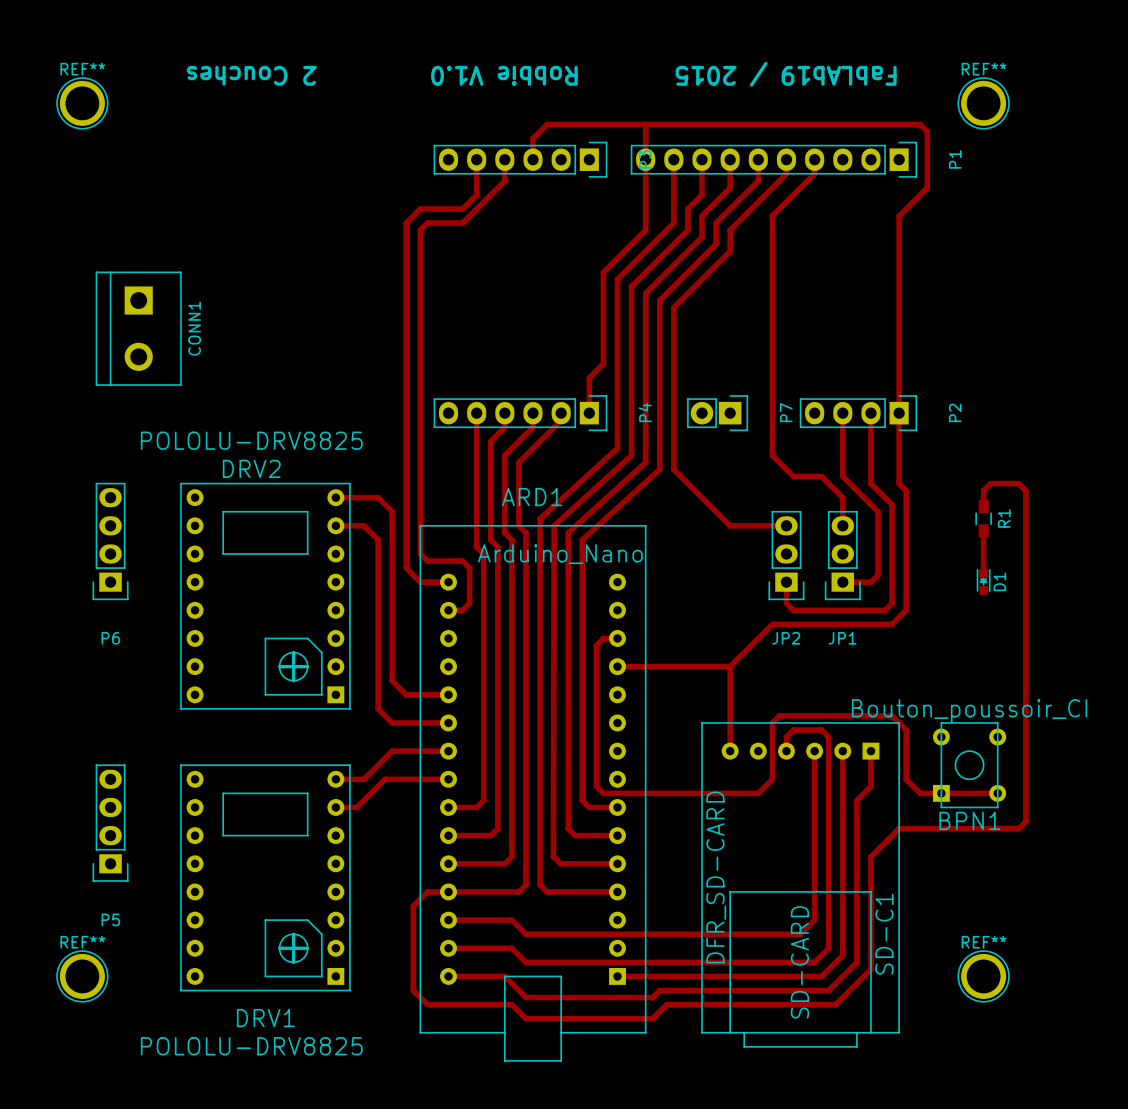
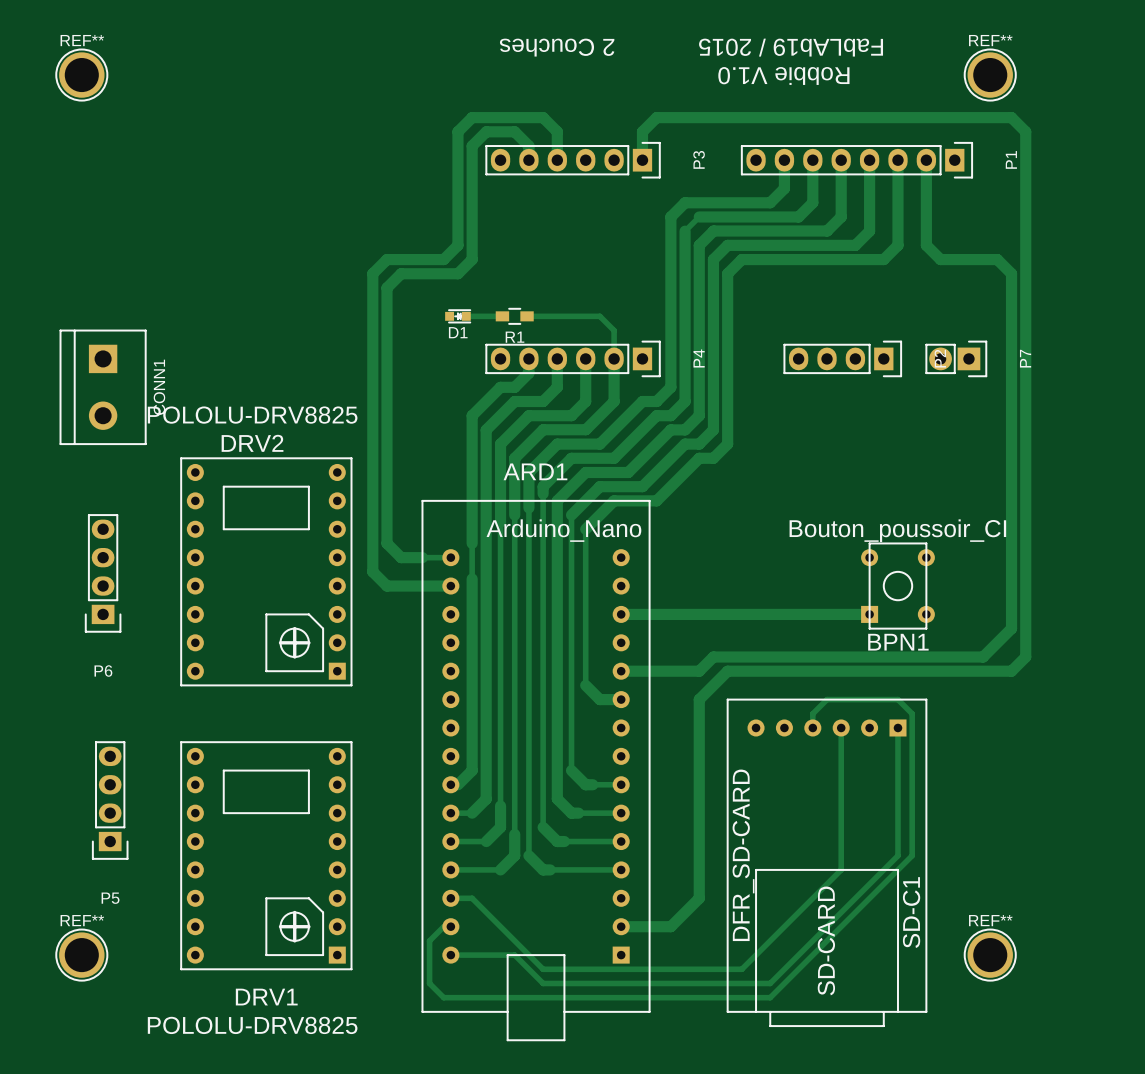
text: 2 Couches (251, 75) -> none
text position: Robbie V1.0 (504, 75) -> Robbie V1.0 (783, 75)
text: none -> 2 Couches (557, 47)
track: (645, 124) (645, 230) (603, 272) (603, 363) (589, 377) (589, 413) -> none
P1 footprint: [630, 141, 918, 178] -> [741, 142, 973, 179]
track: (476, 159) (476, 194) (462, 208) (420, 208) (406, 223) (406, 568) (420, 582) -> (528, 160) (528, 146) (514, 131) (486, 131) (472, 146) (472, 259) (457, 273) (401, 273) (386, 287) (386, 543) (401, 557) (422, 557)
track: (504, 159) (504, 180) (462, 223) (427, 223) (420, 230) (420, 553) (427, 561) (462, 561) (469, 568) -> (528, 358) (528, 373) (514, 387) (500, 387) (472, 415) (472, 543)
P3 position: (520, 159) -> (573, 160)
track: (533, 159) (533, 138) (547, 124) (920, 124) (927, 131) (927, 187) (899, 216) (899, 483) (906, 490) (906, 610) (892, 624) (772, 624) (730, 666) -> none
track: (673, 159) (673, 223) (617, 279) (617, 448) (540, 518) -> none
track: (701, 159) (701, 194) (687, 208) (687, 230) (631, 286) (631, 455) (554, 525) (553, 856) (561, 863) -> none
track: (730, 159) (730, 187) (701, 216) (701, 237) (694, 244) -> (812, 160) (812, 202) (798, 216) (699, 216)
track: (758, 159) (758, 180) (716, 223) (716, 244) (659, 300) (659, 469) (582, 539) (582, 553) -> (897, 160) (897, 245) (883, 259) (741, 259) (727, 273) (727, 444) (713, 458) (699, 458) (656, 500) (614, 500) (585, 529)
track: (786, 159) (786, 173) (730, 230) (730, 251) (673, 307) (673, 469) (730, 525) (786, 525) -> none
track: (814, 159) (814, 173) (772, 216) (772, 455) (793, 476) (821, 476) (842, 497) (842, 525) -> none
P1 name position: P1 (955, 159) -> P1 (1011, 159)
track: none -> (642, 160) (642, 131) (656, 117) (1011, 117) (1025, 131) (1025, 657) (1011, 671) (727, 671) (699, 699) (699, 898) (670, 926) (621, 926)
track: none -> (841, 160) (841, 216) (827, 231) (713, 231) (699, 245) (699, 415) (685, 429) (670, 429) (628, 472) (585, 472) (557, 500) (557, 798) (571, 813) (578, 813)
track: none -> (869, 160) (869, 231) (855, 245) (727, 245) (713, 259) (713, 429) (699, 444) (685, 444) (642, 486) (599, 486) (571, 515)
track: none -> (926, 160) (926, 245) (940, 259) (997, 259) (1011, 273) (1011, 628) (983, 657) (713, 657) (699, 671) (621, 671)
track: (680, 258) (645, 293) (645, 462) (568, 532) (568, 539) -> (685, 231) (685, 401) (670, 415) (656, 415) (614, 458) (571, 458) (543, 486) (543, 493)
CONN1 position: (138, 328) -> (103, 387)
track: none -> (466, 316) (502, 316)
track: none -> (557, 358) (557, 387) (543, 401) (514, 401) (486, 430) (486, 799) (472, 813)
track: (476, 413) (476, 546) (483, 553) (483, 800) (476, 807) (455, 807) -> (472, 578) (472, 770) (457, 784)
track: (504, 413) (504, 427) (490, 441) (490, 539) (497, 546) -> (585, 358) (585, 401) (571, 415) (528, 415) (500, 444) (500, 522)
P4 position: (520, 413) -> (573, 358)
track: (533, 413) (533, 427) (504, 455) (504, 532) (511, 539) -> (527, 316) (599, 316) (614, 330) (614, 401) (585, 429) (543, 429) (514, 458) (514, 515)
track: (561, 413) (561, 420) (518, 462) (518, 525) (525, 532) -> (784, 160) (784, 188) (770, 202) (685, 202) (670, 216) (670, 387) (656, 401) (642, 401) (599, 444) (557, 444) (528, 472) (528, 507)
P7 position: (717, 413) -> (956, 358)
track: (842, 413) (842, 476) (878, 511) (878, 575) (870, 582) (842, 582) -> none
P2 position: (858, 413) -> (842, 358)
track: (870, 413) (870, 483) (892, 504) (892, 603) (885, 610) (793, 610) (786, 603) (786, 582) -> none
track: (335, 497) (378, 497) (392, 511) (392, 680) (406, 694) (448, 694) -> none
track: (983, 506) (983, 490) (990, 483) (1018, 483) (1025, 490) (1025, 821) (1018, 828) (899, 828) (870, 856) (870, 969) (835, 1004) (765, 1004) -> (897, 727) (897, 855) (770, 983)
R1 rotation: 0° (983, 518) -> 90° clockwise (514, 316)
R1 position: (983, 518) -> (514, 316)
track: (335, 525) (364, 525) (378, 539) (378, 708) (392, 722) (448, 722) -> none
track: (983, 530) (983, 573) -> none
P6 position: (110, 541) -> (103, 573)
JP2: (786, 555) -> none
JP1: (842, 555) -> none
D1 rotation: 0° (983, 581) -> 90° clockwise (458, 316)
D1 position: (983, 581) -> (458, 316)
track: (469, 603) (462, 610) (448, 610) -> (557, 160) (557, 131) (543, 117) (472, 117) (457, 131) (457, 245) (443, 259) (386, 259) (372, 273) (372, 571) (386, 586) (450, 586)
track: (617, 638) (603, 638) (596, 645) (596, 786) (603, 793) (758, 793) (772, 779) (772, 722) (779, 715) (892, 715) (906, 730) (906, 737) -> (621, 614) (869, 614)
track: (617, 666) (730, 666) -> none
track: (730, 666) (730, 751) -> none
track: (582, 708) (582, 800) (589, 807) -> (585, 685) (599, 699) (621, 699)
track: none -> (912, 713) (897, 699) (827, 699) (812, 713) (812, 727)
track: (448, 751) (392, 751) (364, 779) (335, 779) -> none
track: (786, 751) (786, 737) (793, 730) (821, 730) (828, 737) (828, 948) (814, 962) (525, 962) (511, 948) (448, 948) -> none
track: (814, 751) (814, 920) (800, 934) (525, 934) (511, 920) (469, 920) -> (663, 969) (543, 969) (472, 898)
track: (842, 751) (842, 955) (821, 976) (617, 976) -> none
track: (870, 751) (870, 786) (856, 800) (856, 962) (828, 990) (737, 990) -> (841, 727) (841, 869) (741, 969)
BPN1 position: (969, 765) -> (897, 586)
track: (448, 779) (385, 779) (356, 807) (335, 807) -> none
track: (906, 779) (920, 793) (997, 793) -> none
track: (568, 793) (568, 828) (575, 835) -> (571, 770) (585, 784) (592, 784)
track: (497, 828) (490, 835) (469, 835) -> (500, 806) (500, 827) (486, 841)
track: (540, 849) (540, 884) (547, 891) -> (543, 827) (557, 841) (564, 841)
track: (511, 856) (504, 863) (483, 863) -> none
track: (525, 877) (525, 884) (518, 891) (497, 891) -> (514, 834) (514, 855) (500, 869)
track: none -> (528, 855) (543, 869) (550, 869)
SD-C1 position: (800, 884) -> (827, 862)
track: (448, 891) (427, 891) (413, 906) (413, 990) (427, 1004) (511, 1004) (525, 1018) -> (450, 926) (443, 926) (429, 940) (429, 983) (443, 997) (528, 997)
track: (504, 976) (525, 997) (652, 997) (659, 990) -> (507, 955) (514, 955) (543, 983) (670, 983)
track: (666, 1004) (652, 1018) -> (912, 756) (912, 855) (770, 997) (656, 997)

